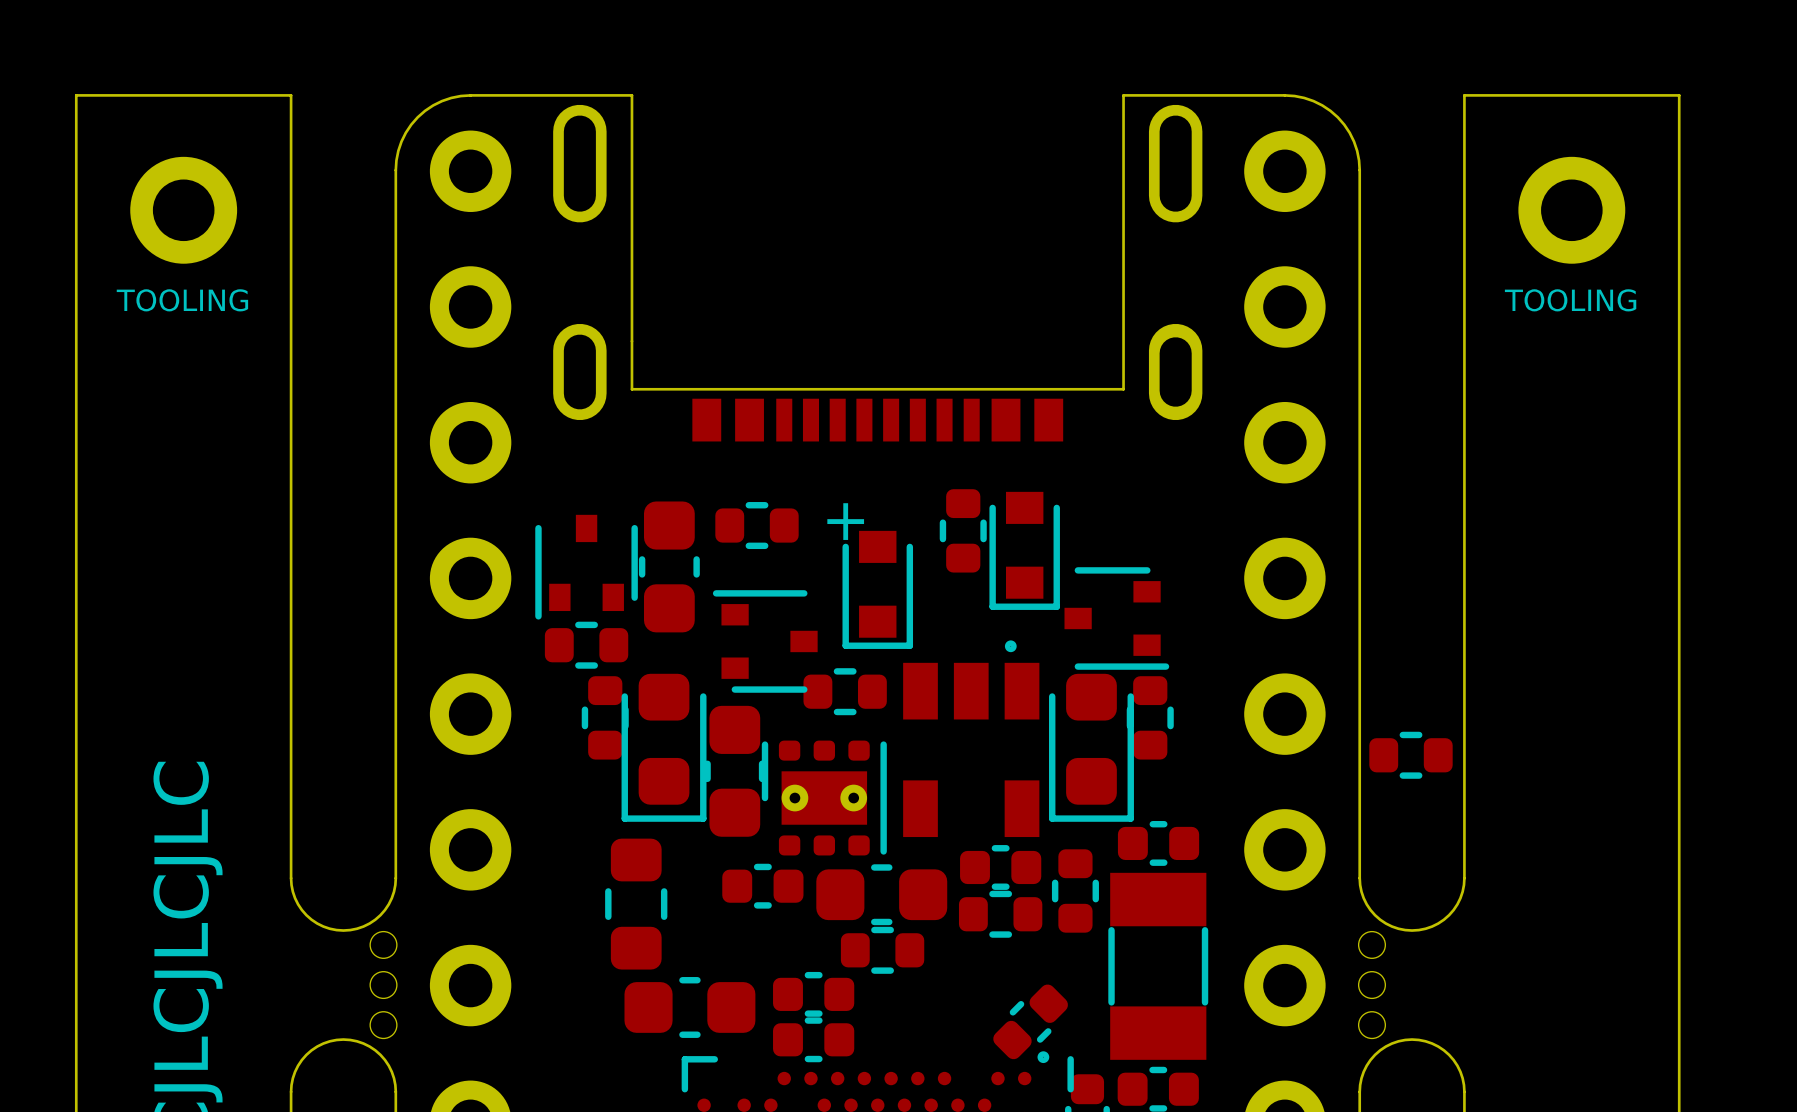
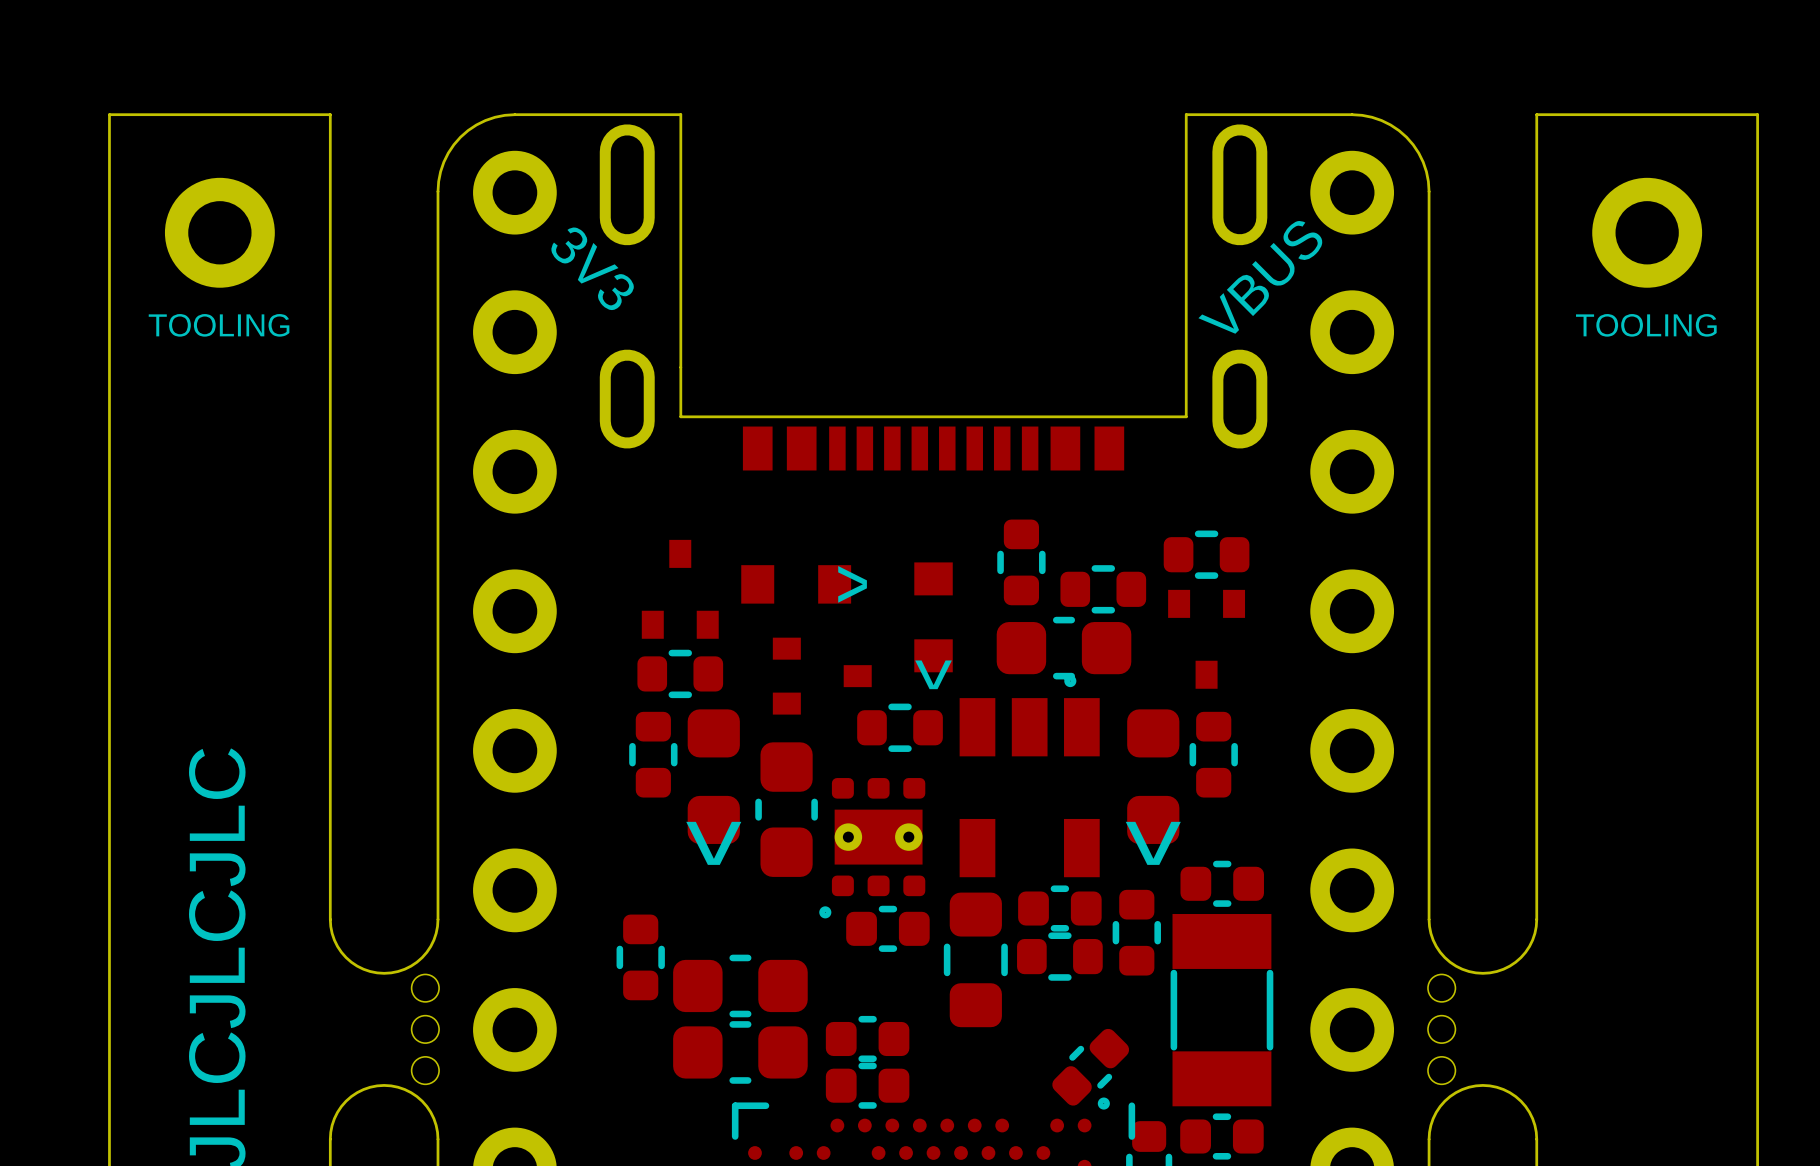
text: none -> 3V3 (592, 268)
text: none -> VBUS (1260, 276)
part footprint: [989, 491, 1060, 610] -> [1060, 565, 1147, 614]
part footprint: [715, 502, 799, 550] -> [741, 565, 852, 604]
text: + (845, 521) -> none
part: none -> (1206, 554)
part footprint: [842, 530, 914, 649] -> [914, 562, 953, 673]
text: none -> ^ (852, 584)
part: none -> (680, 589)
part: (669, 566) -> none
part: (586, 567) -> none
part footprint: [1064, 567, 1170, 670] -> [1168, 589, 1246, 689]
part footprint: [712, 590, 818, 693] -> [772, 637, 872, 715]
part: none -> (1064, 648)
text: none -> ^ (933, 674)
part position: (586, 645) -> (680, 673)
part footprint: [621, 673, 707, 822] -> [687, 709, 740, 844]
part footprint: [1049, 673, 1134, 822] -> [1127, 709, 1180, 844]
part footprint: [761, 740, 887, 856] -> [831, 778, 926, 897]
part: (1411, 755) -> none
text: none -> ^ (713, 843)
text: none -> ^ (1153, 843)
drawing: none -> [819, 906, 832, 919]
part position: (762, 886) -> (887, 928)
part: (881, 894) -> none
part position: (636, 904) -> (975, 959)
part: none -> (640, 957)
part: none -> (740, 985)
part: (882, 950) -> none

